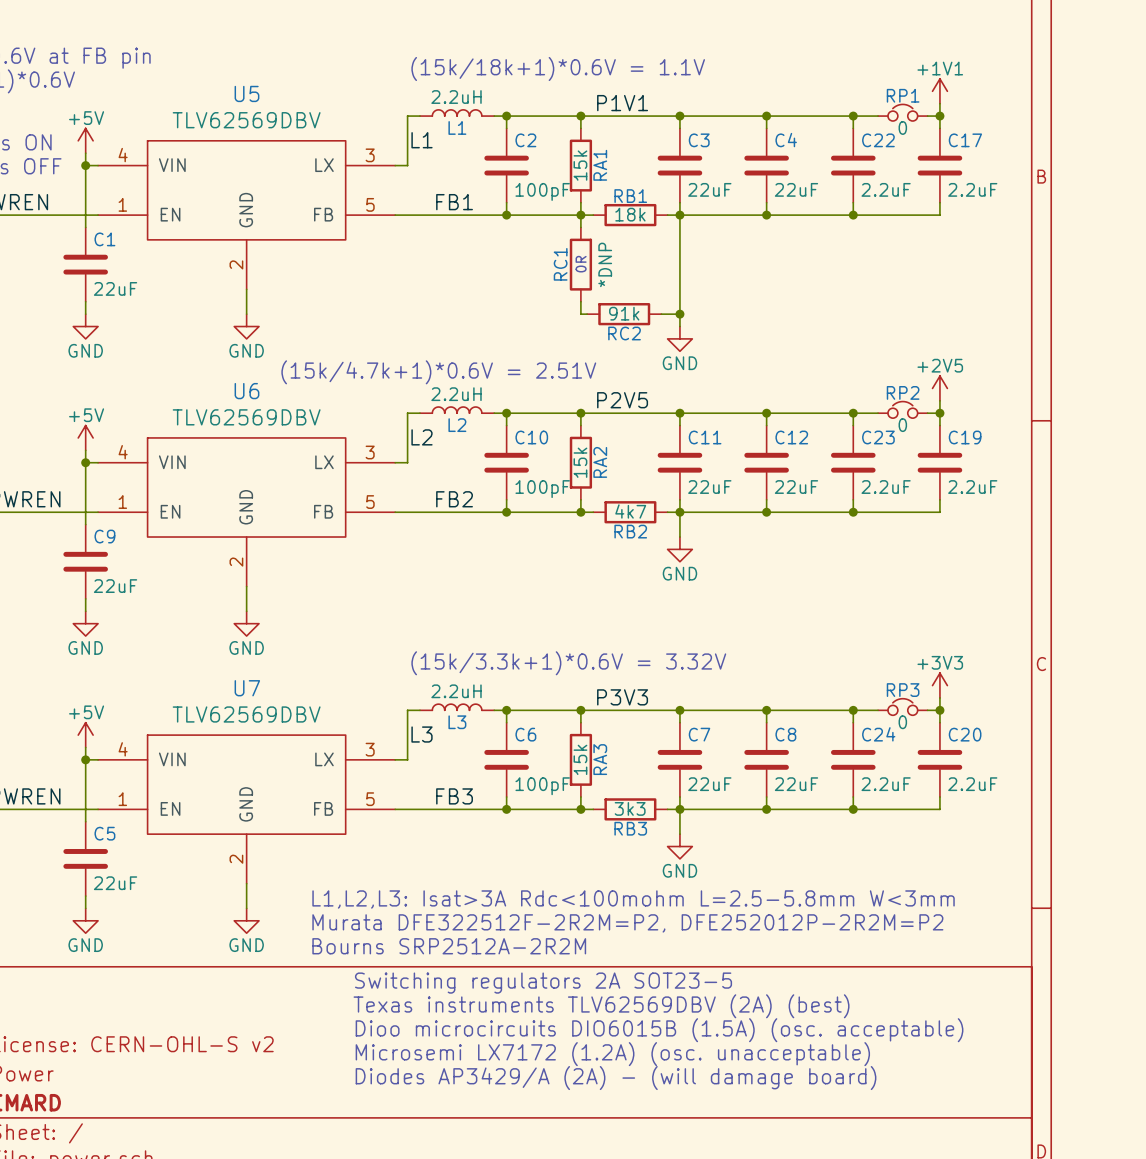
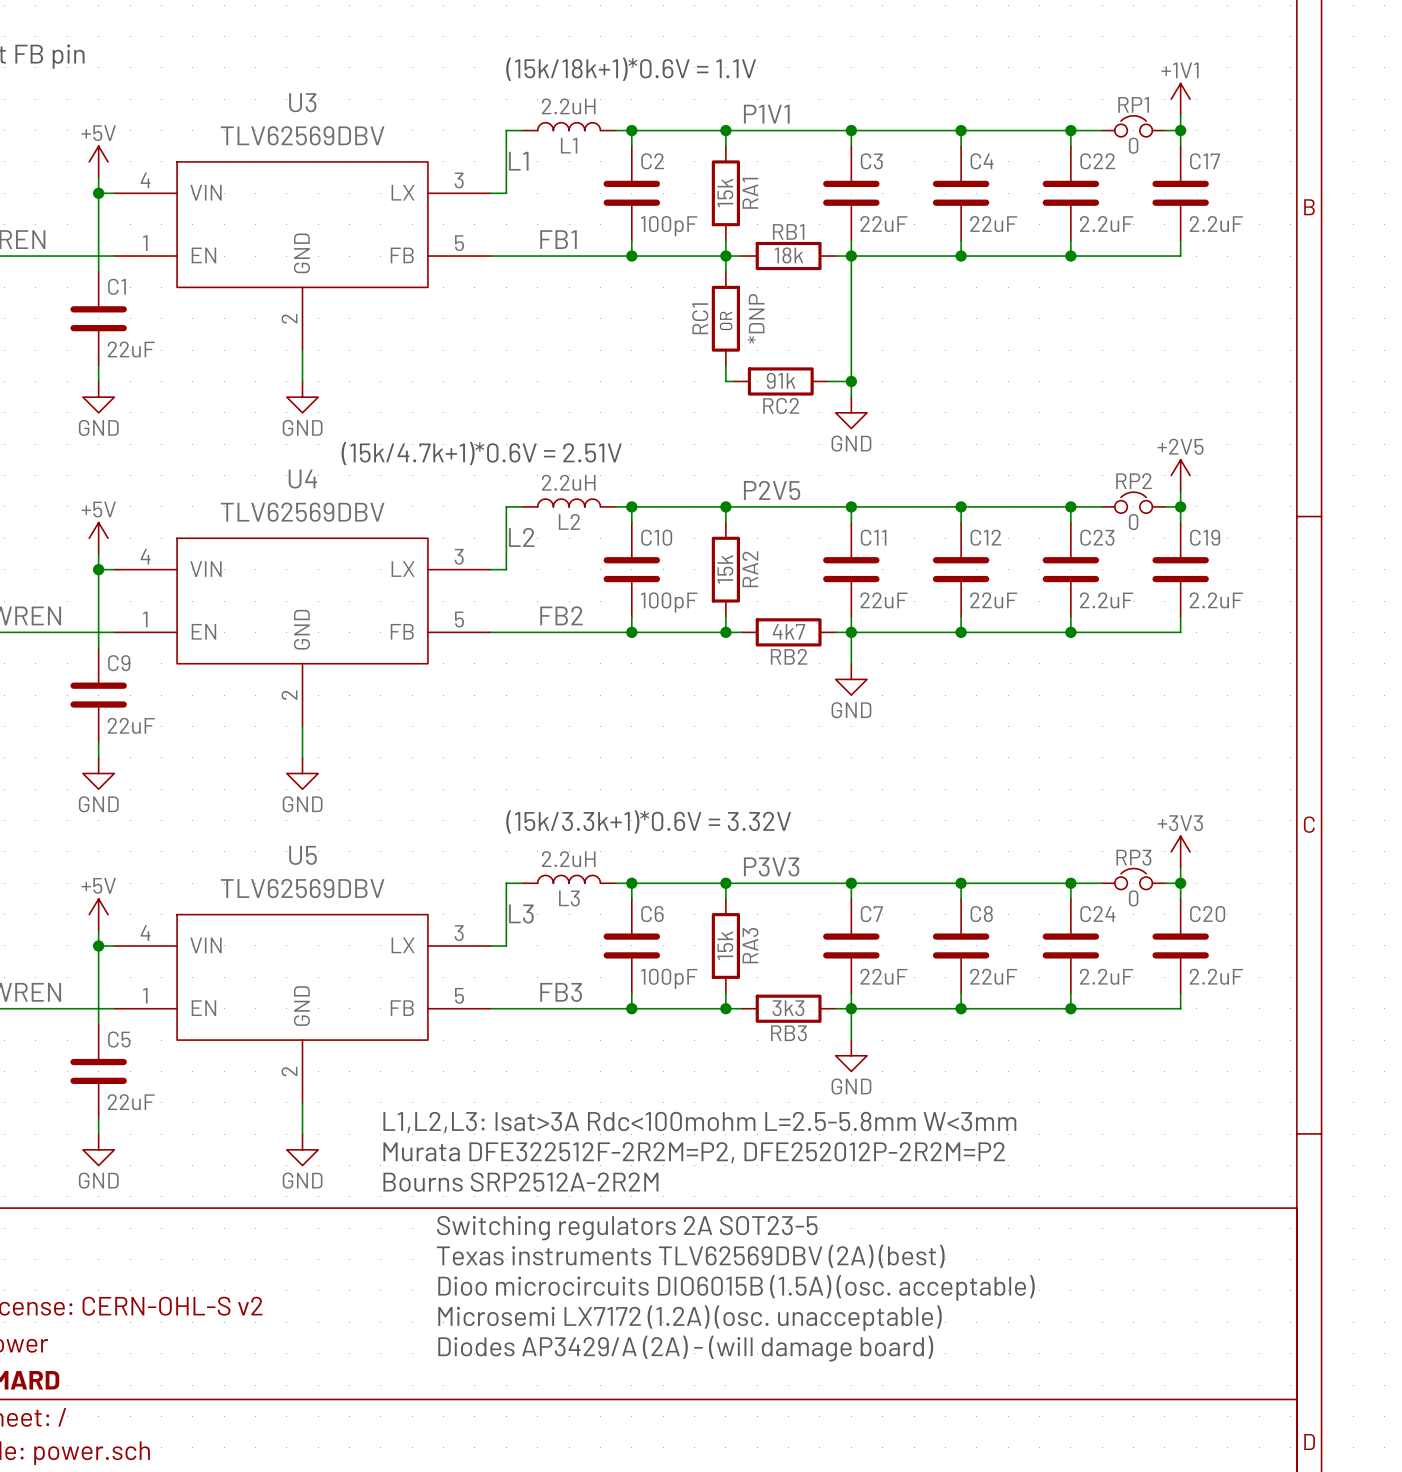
U5 name: U5 (246, 93) -> U3 (302, 102)
U6 name: U6 (246, 391) -> U4 (302, 479)
U7 name: U7 (247, 688) -> U5 (302, 855)

